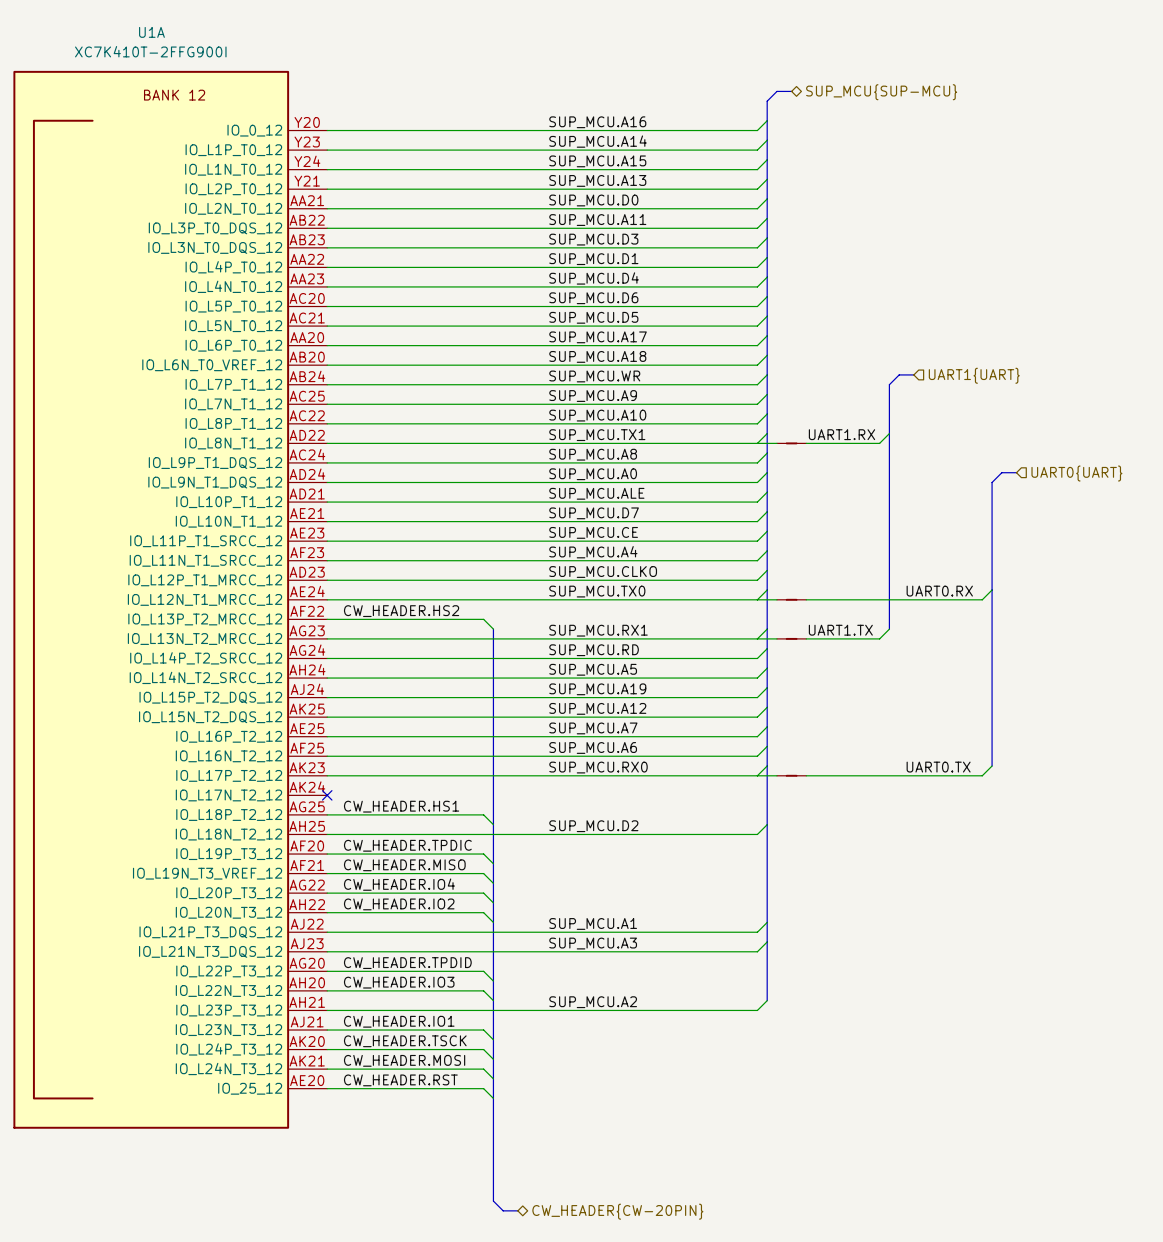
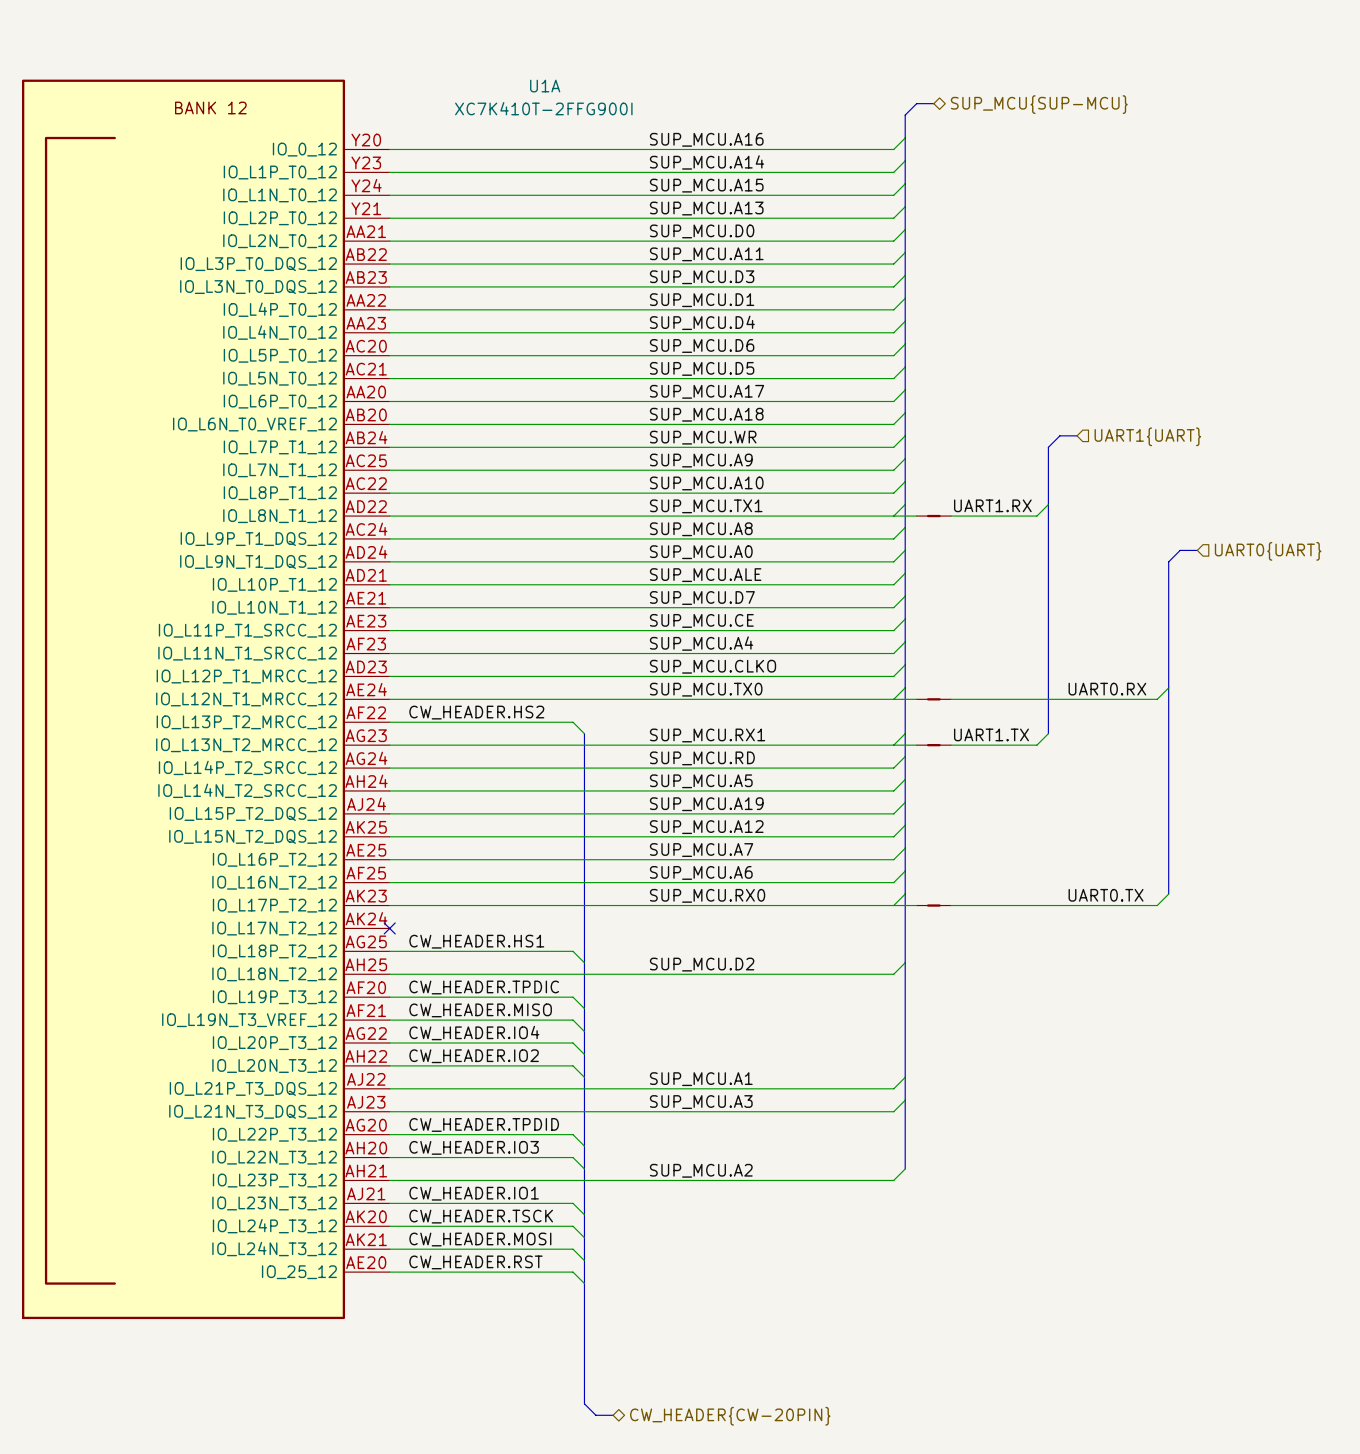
U1A name position: U1A (151, 32) -> U1A (545, 86)
U1A value position: XC7K410T-2FFG900I (150, 51) -> XC7K410T-2FFG900I (543, 108)

